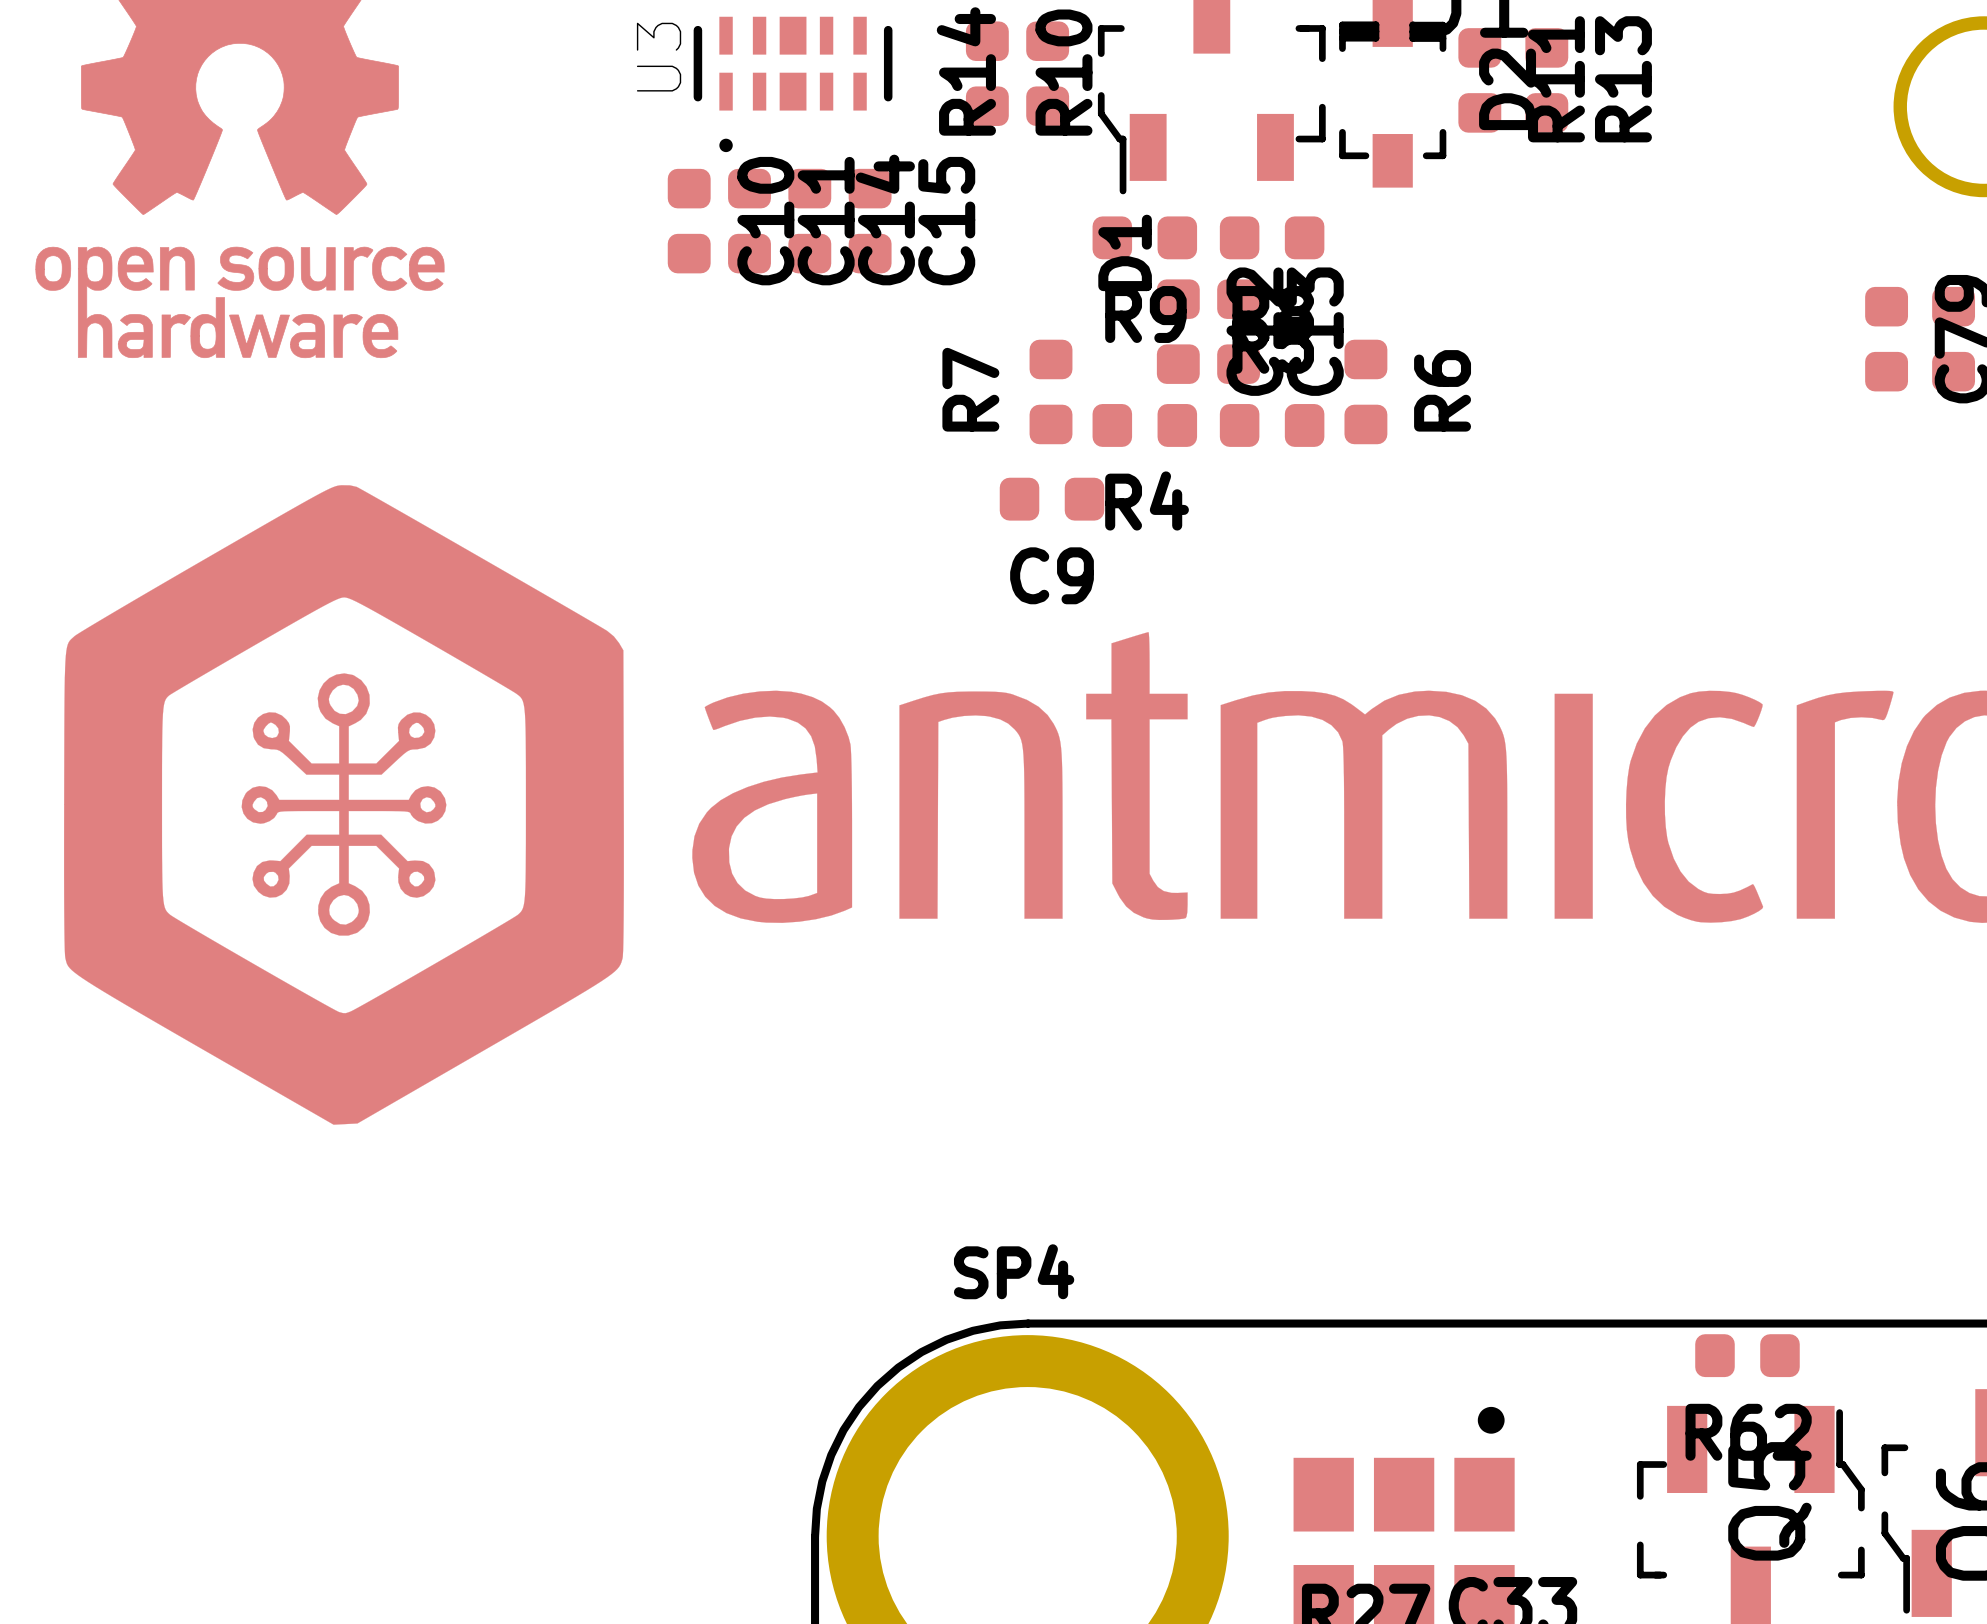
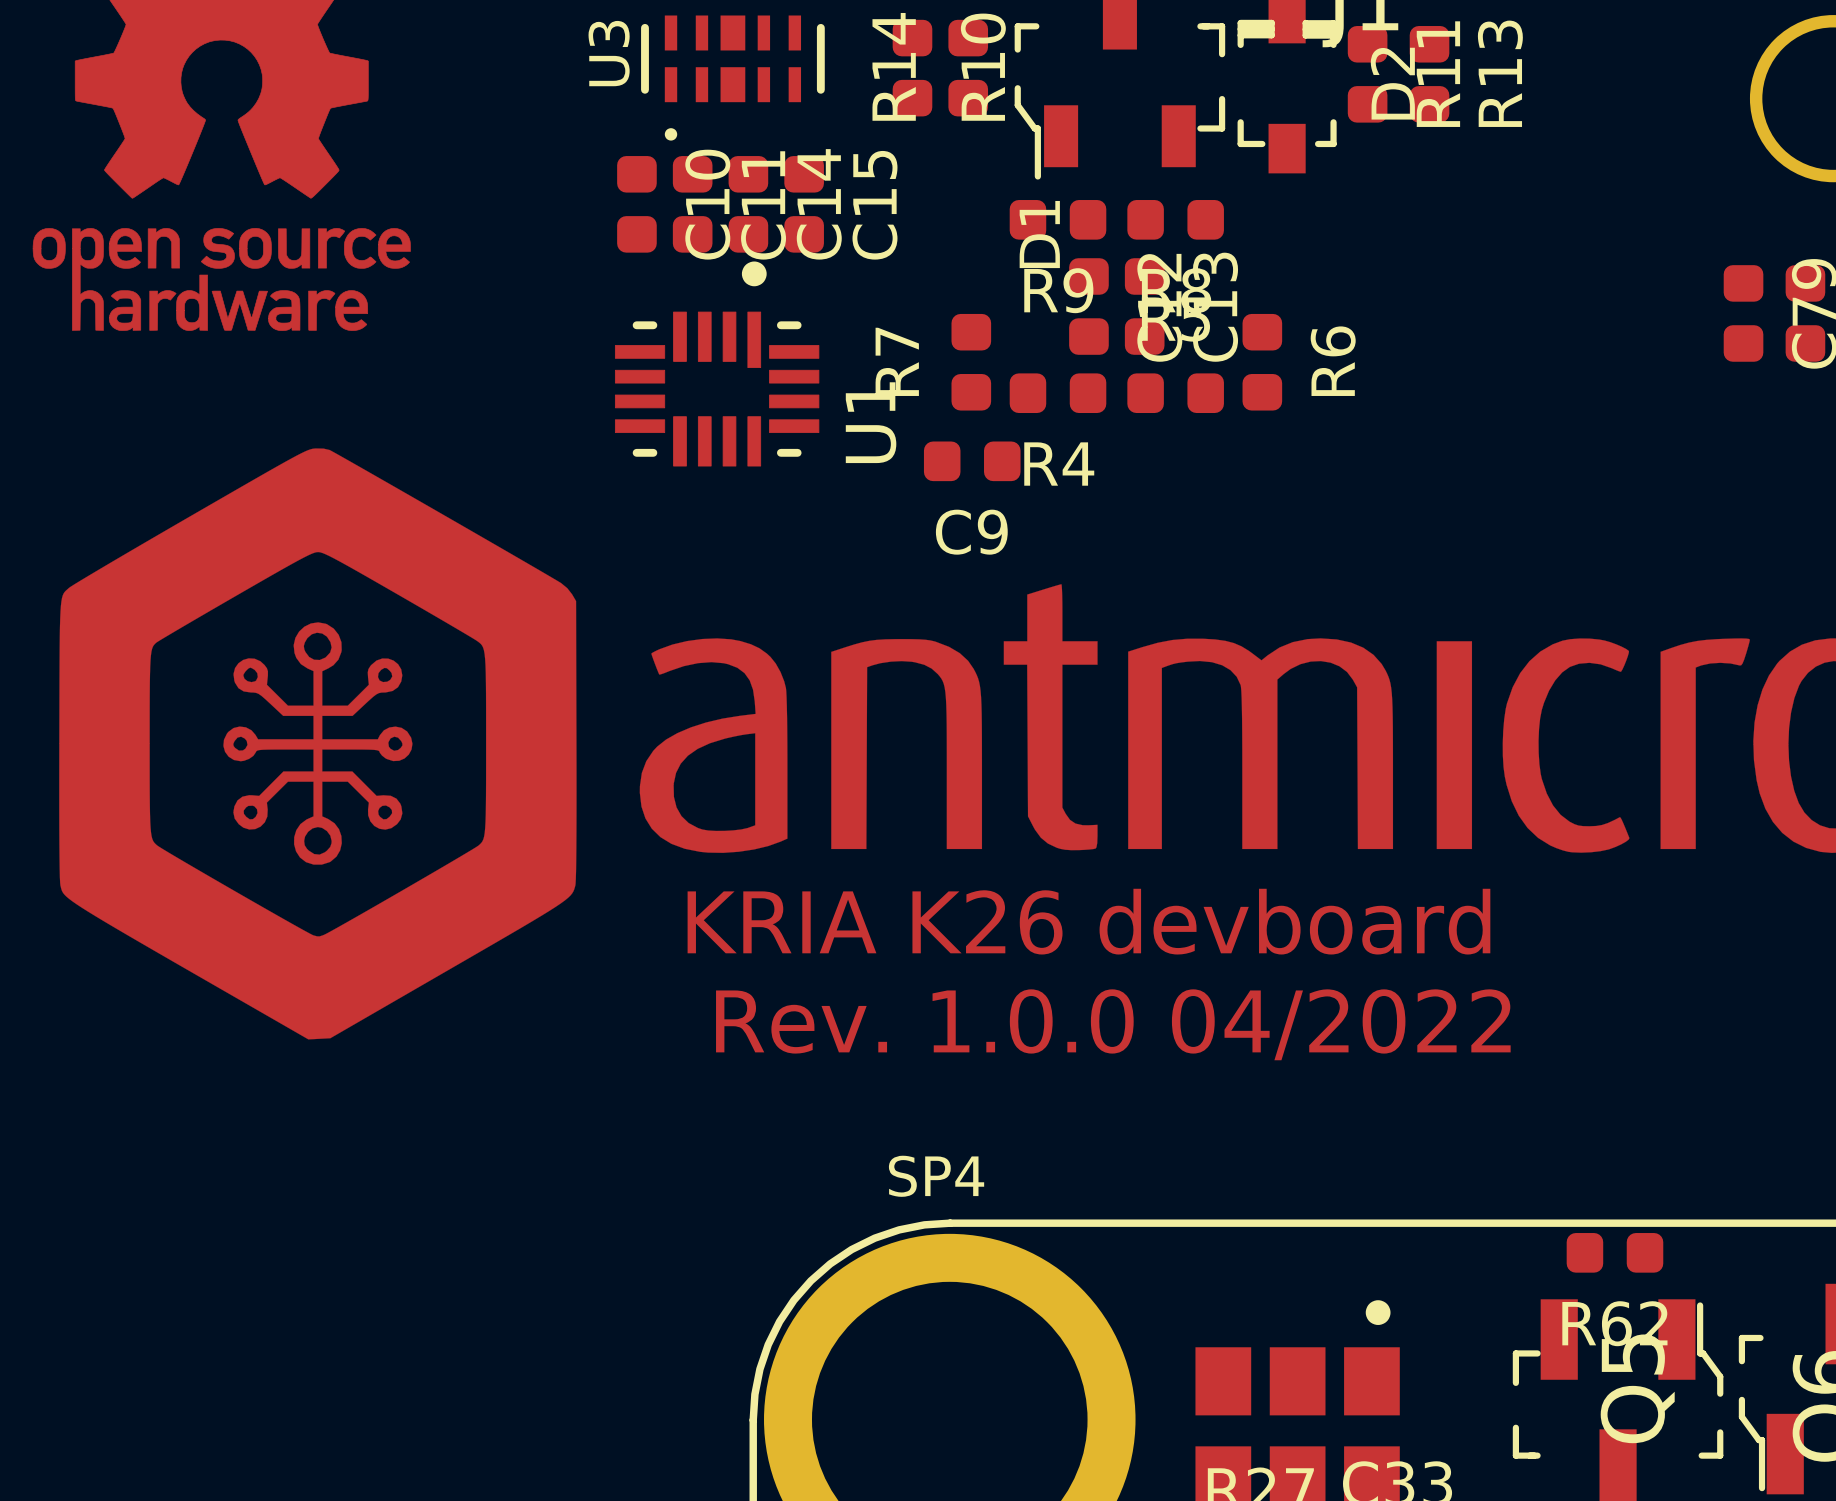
U1: none -> (717, 363)
text: none -> KRIA K26 devboard (1088, 921)
text: none -> Rev. 1.0.0 04/2022 (1113, 1024)

